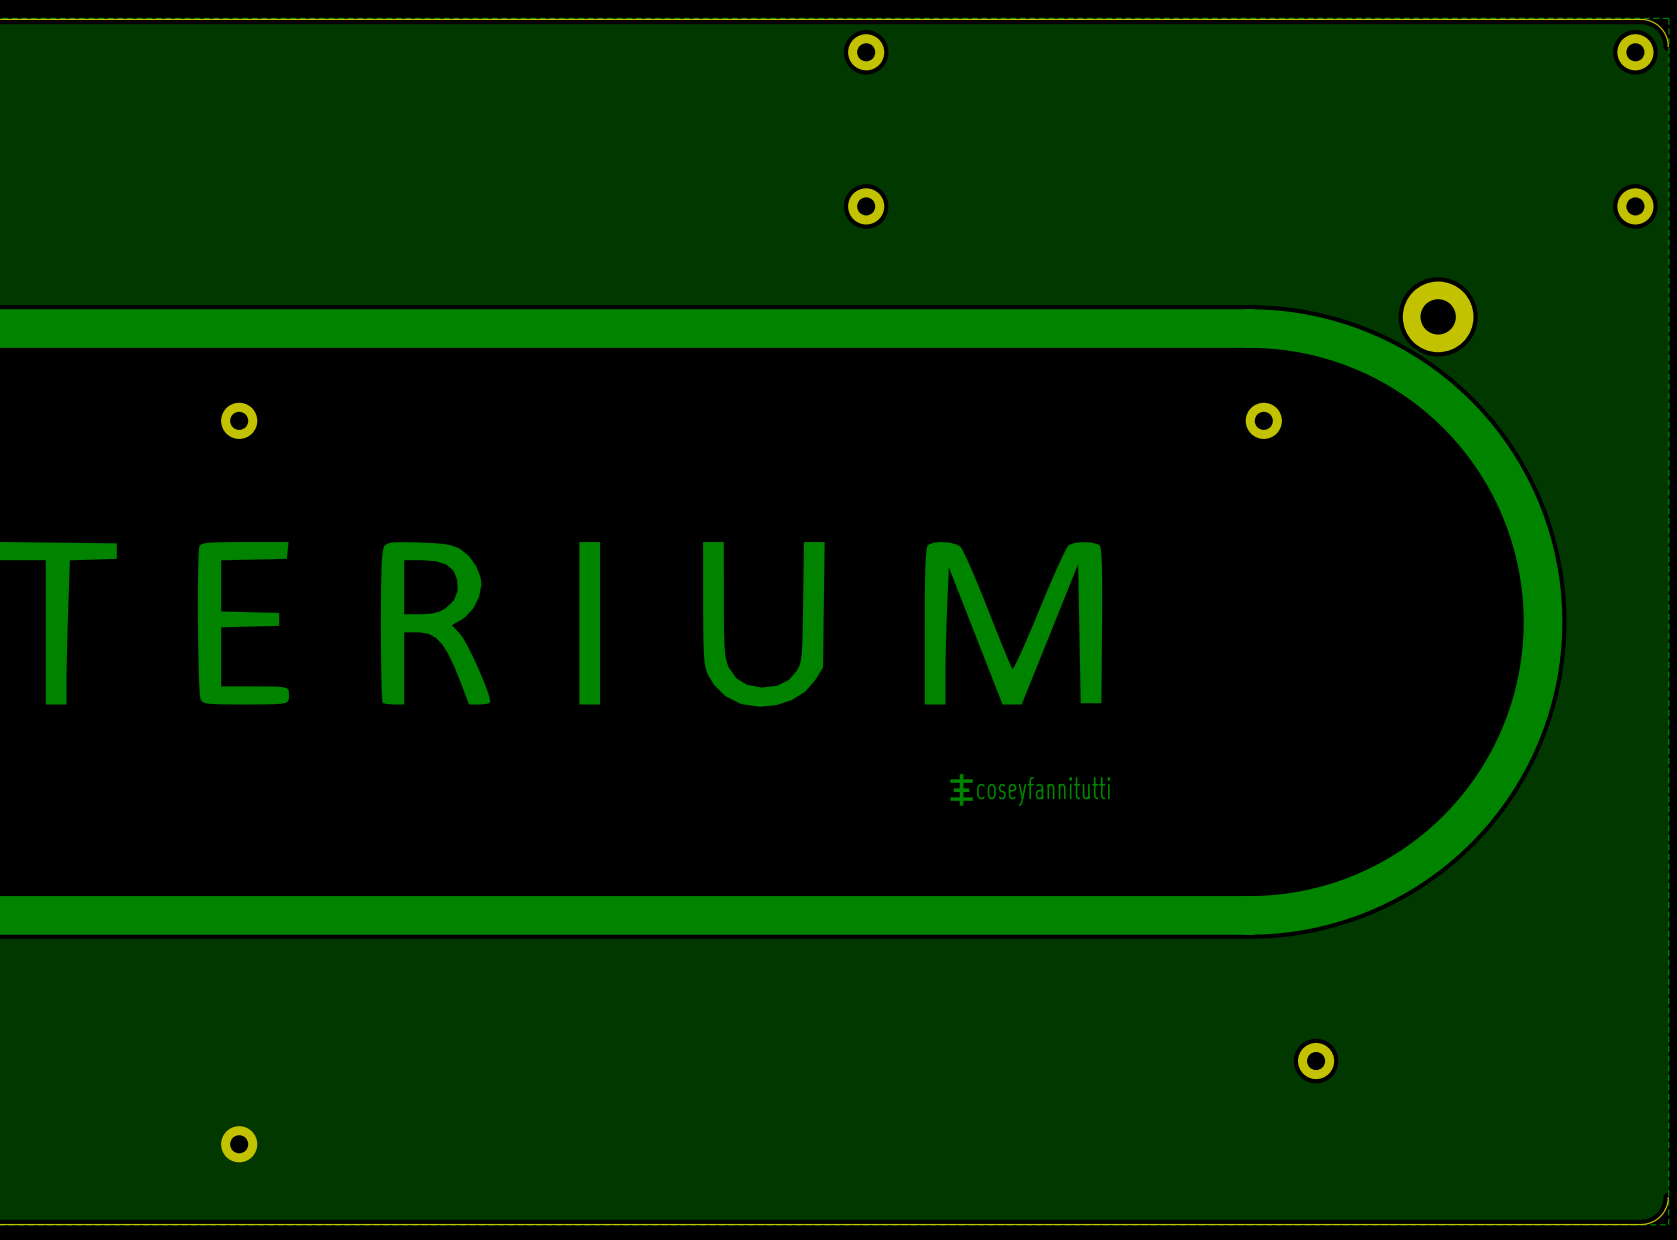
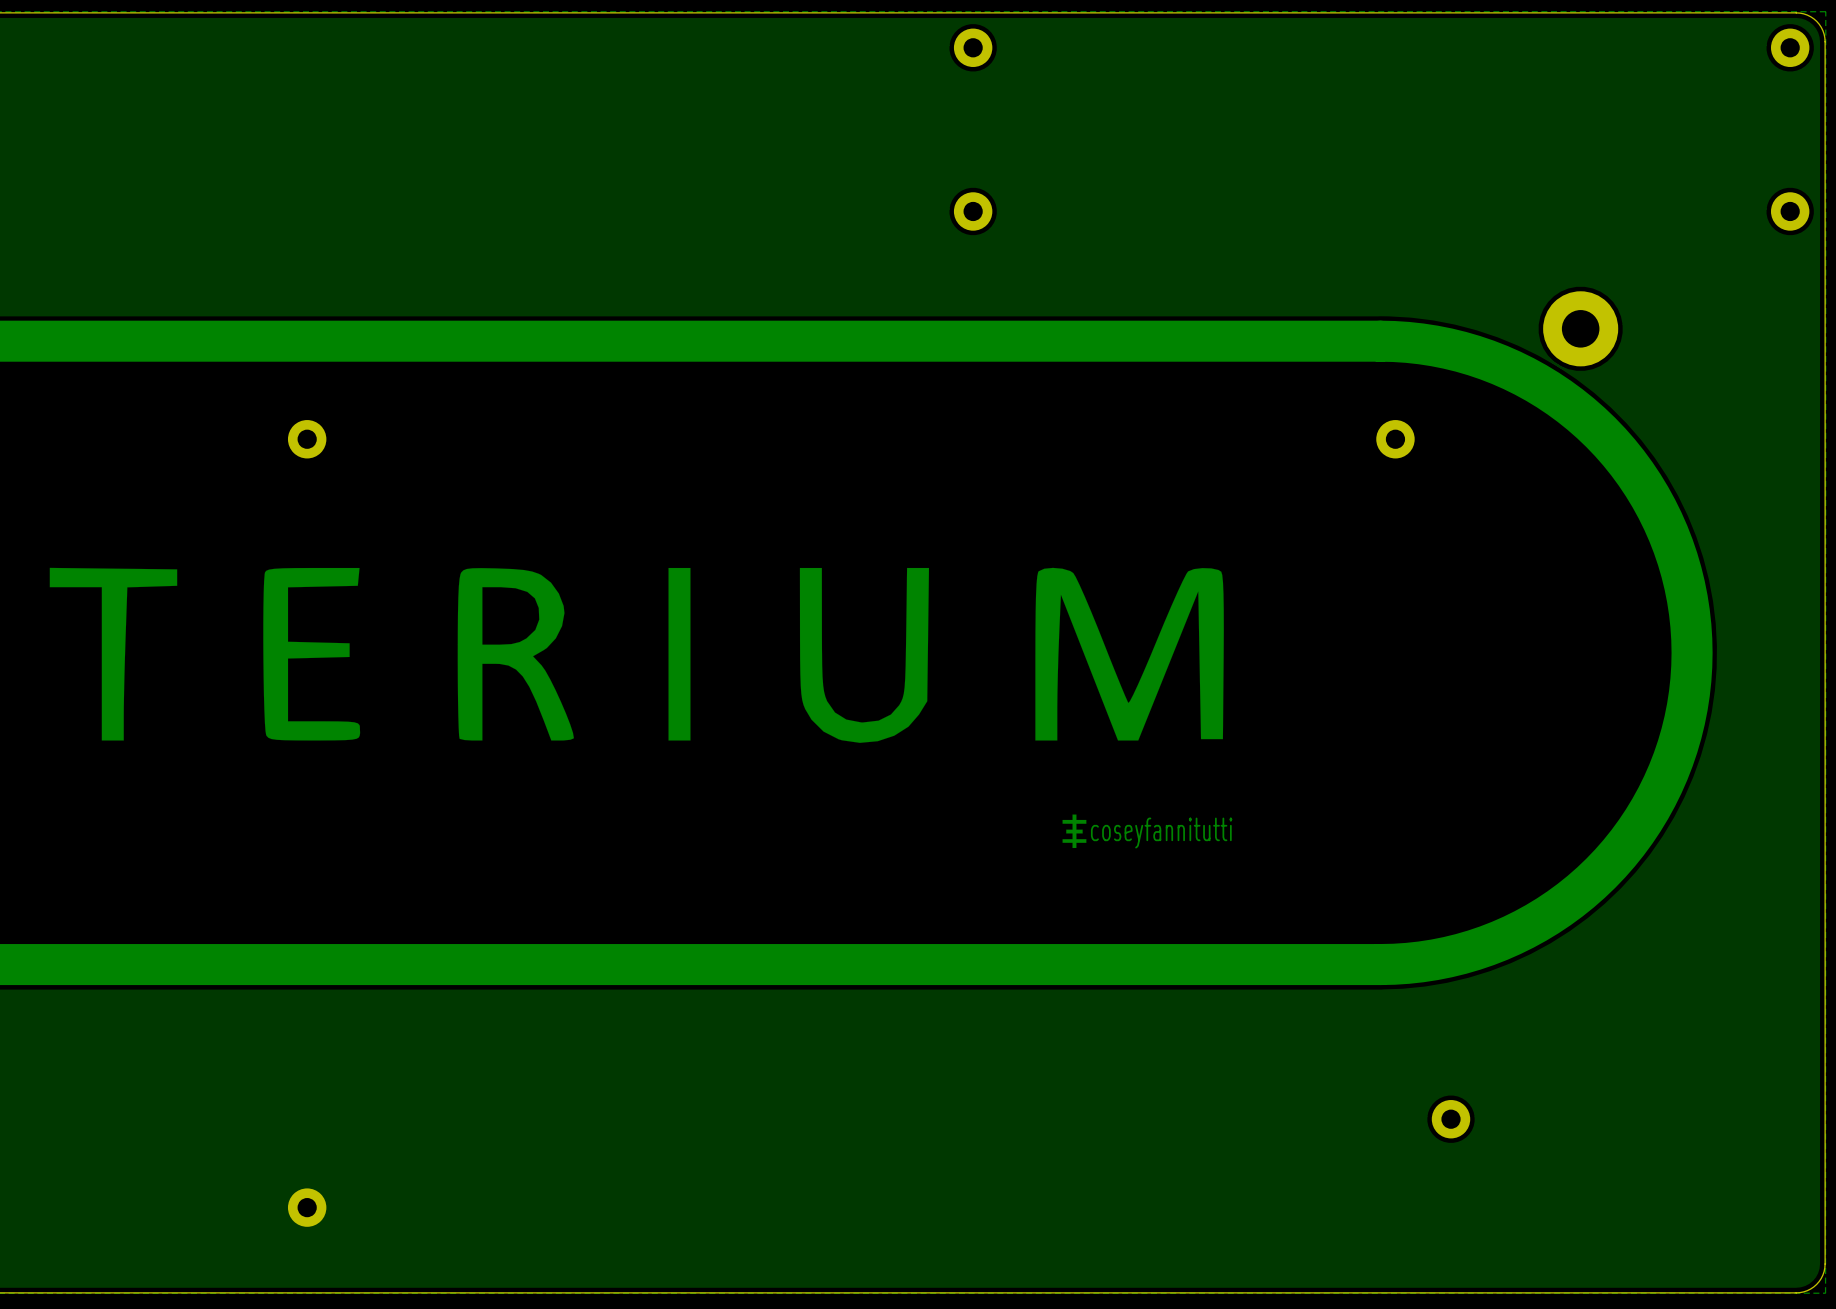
board edge: none -> (1825, 41) (1825, 1264)

